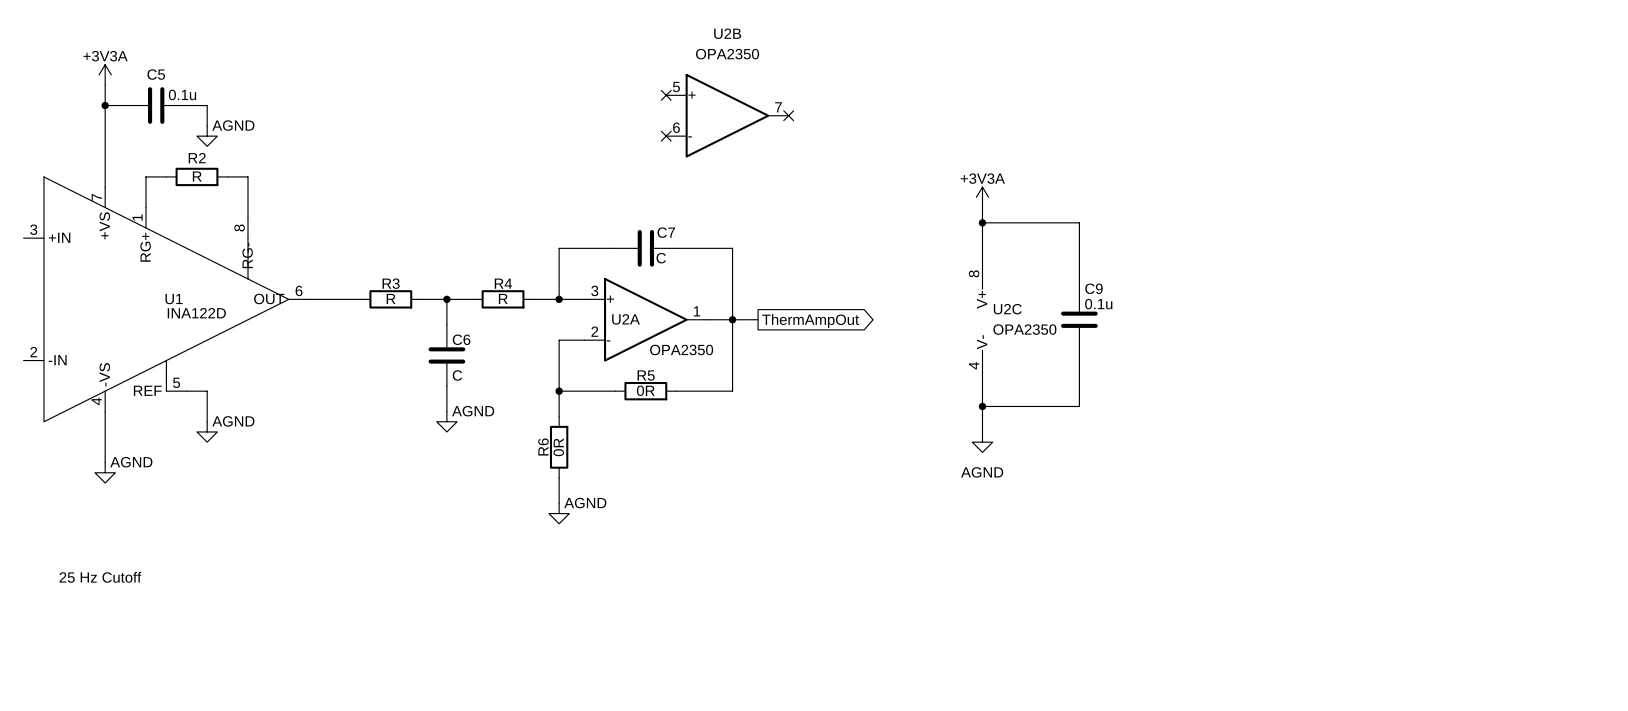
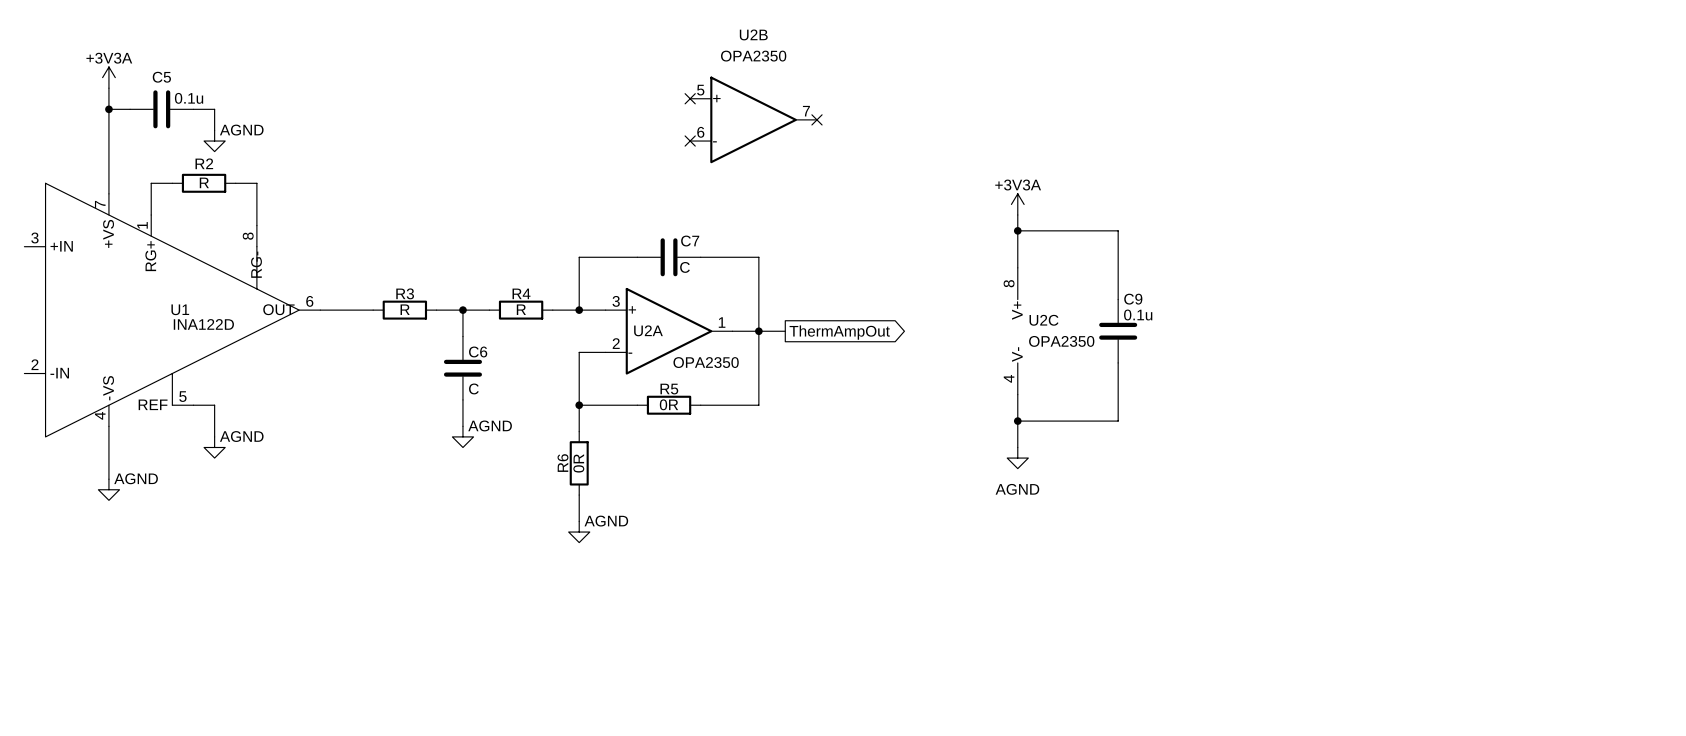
text: 25 Hz Cutoff (100, 577) -> none

